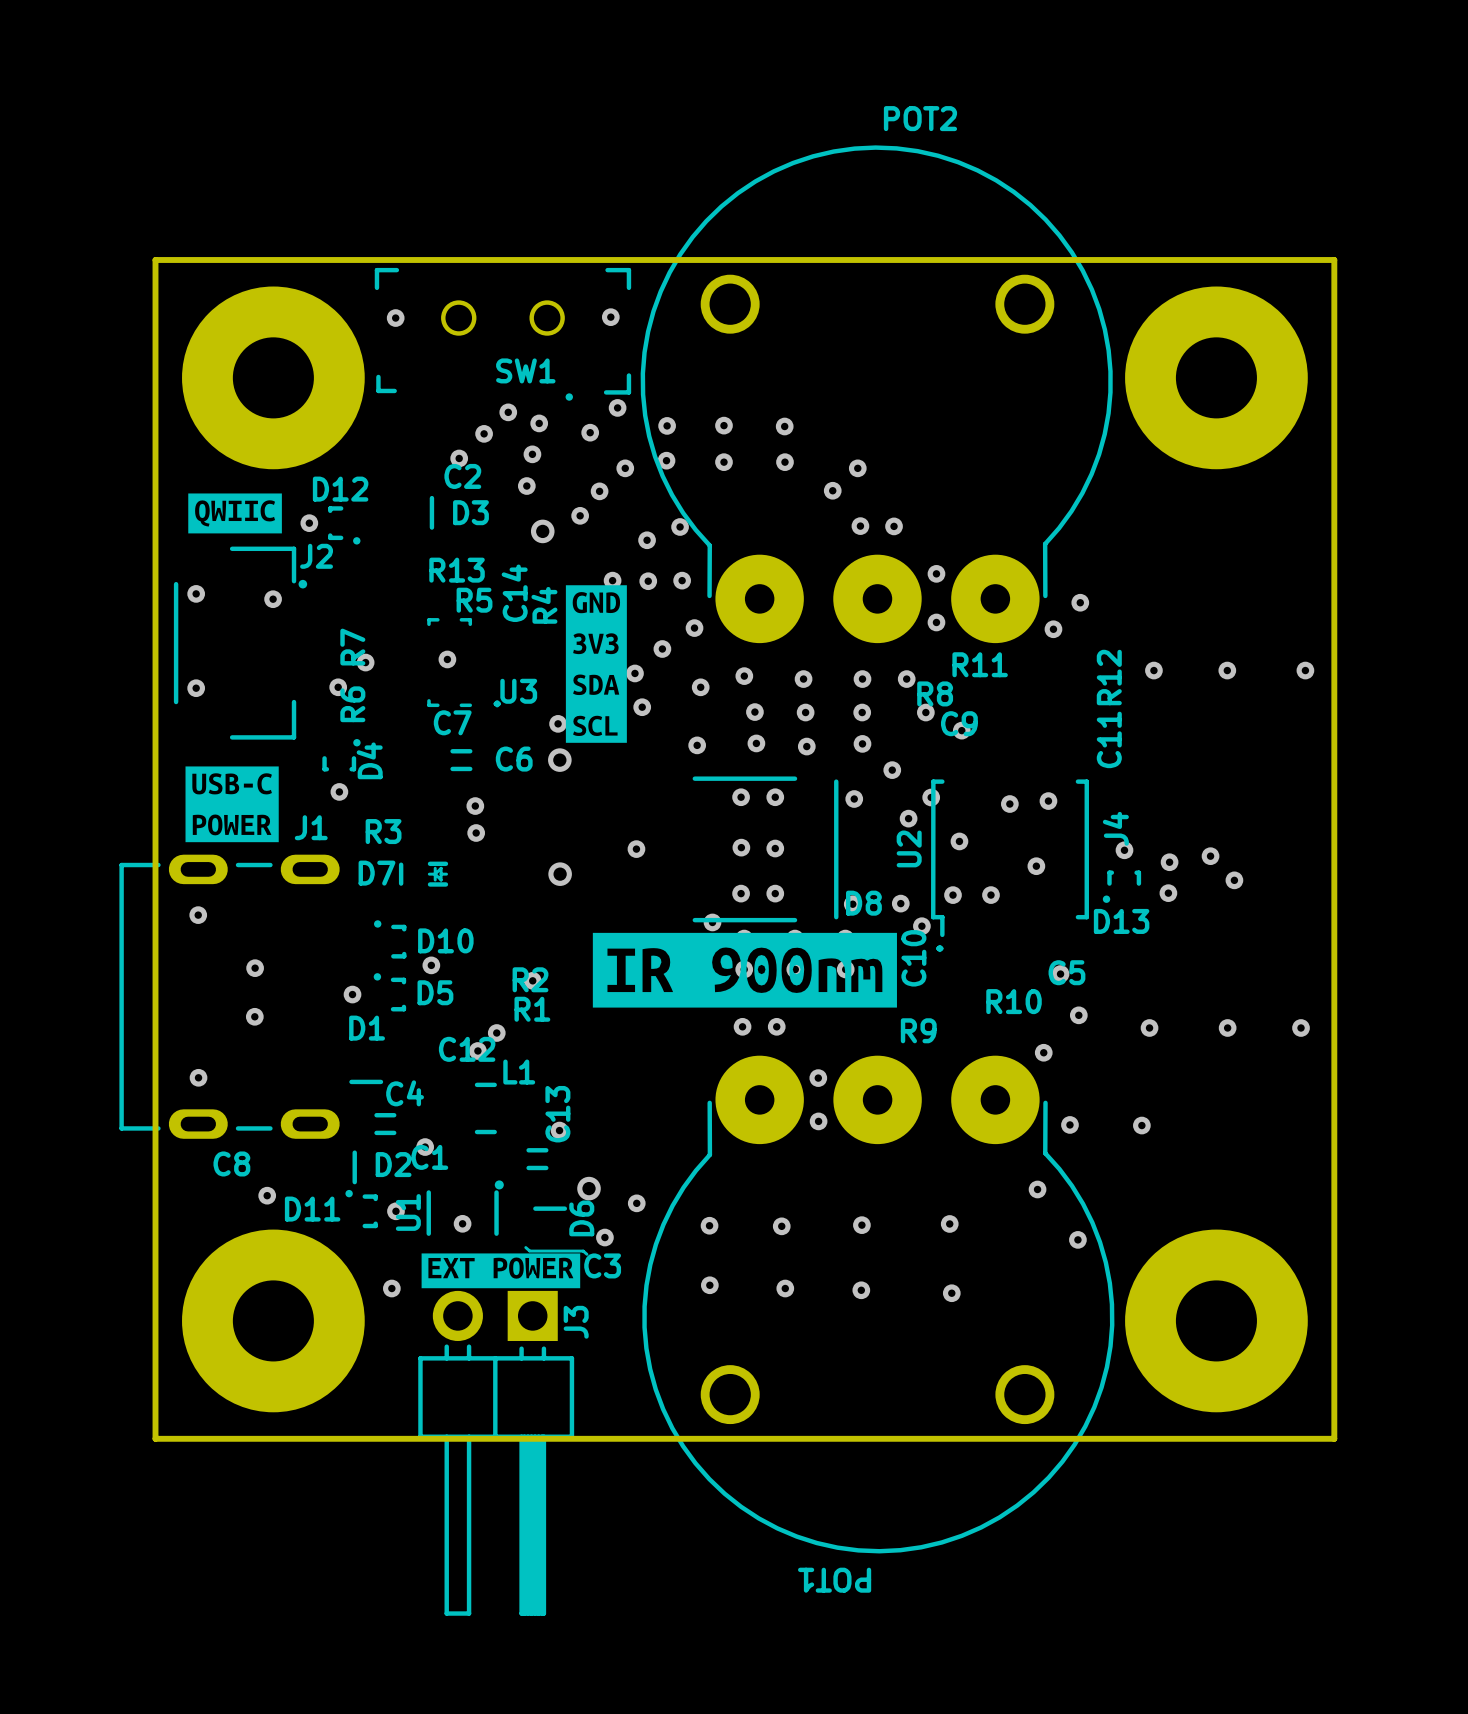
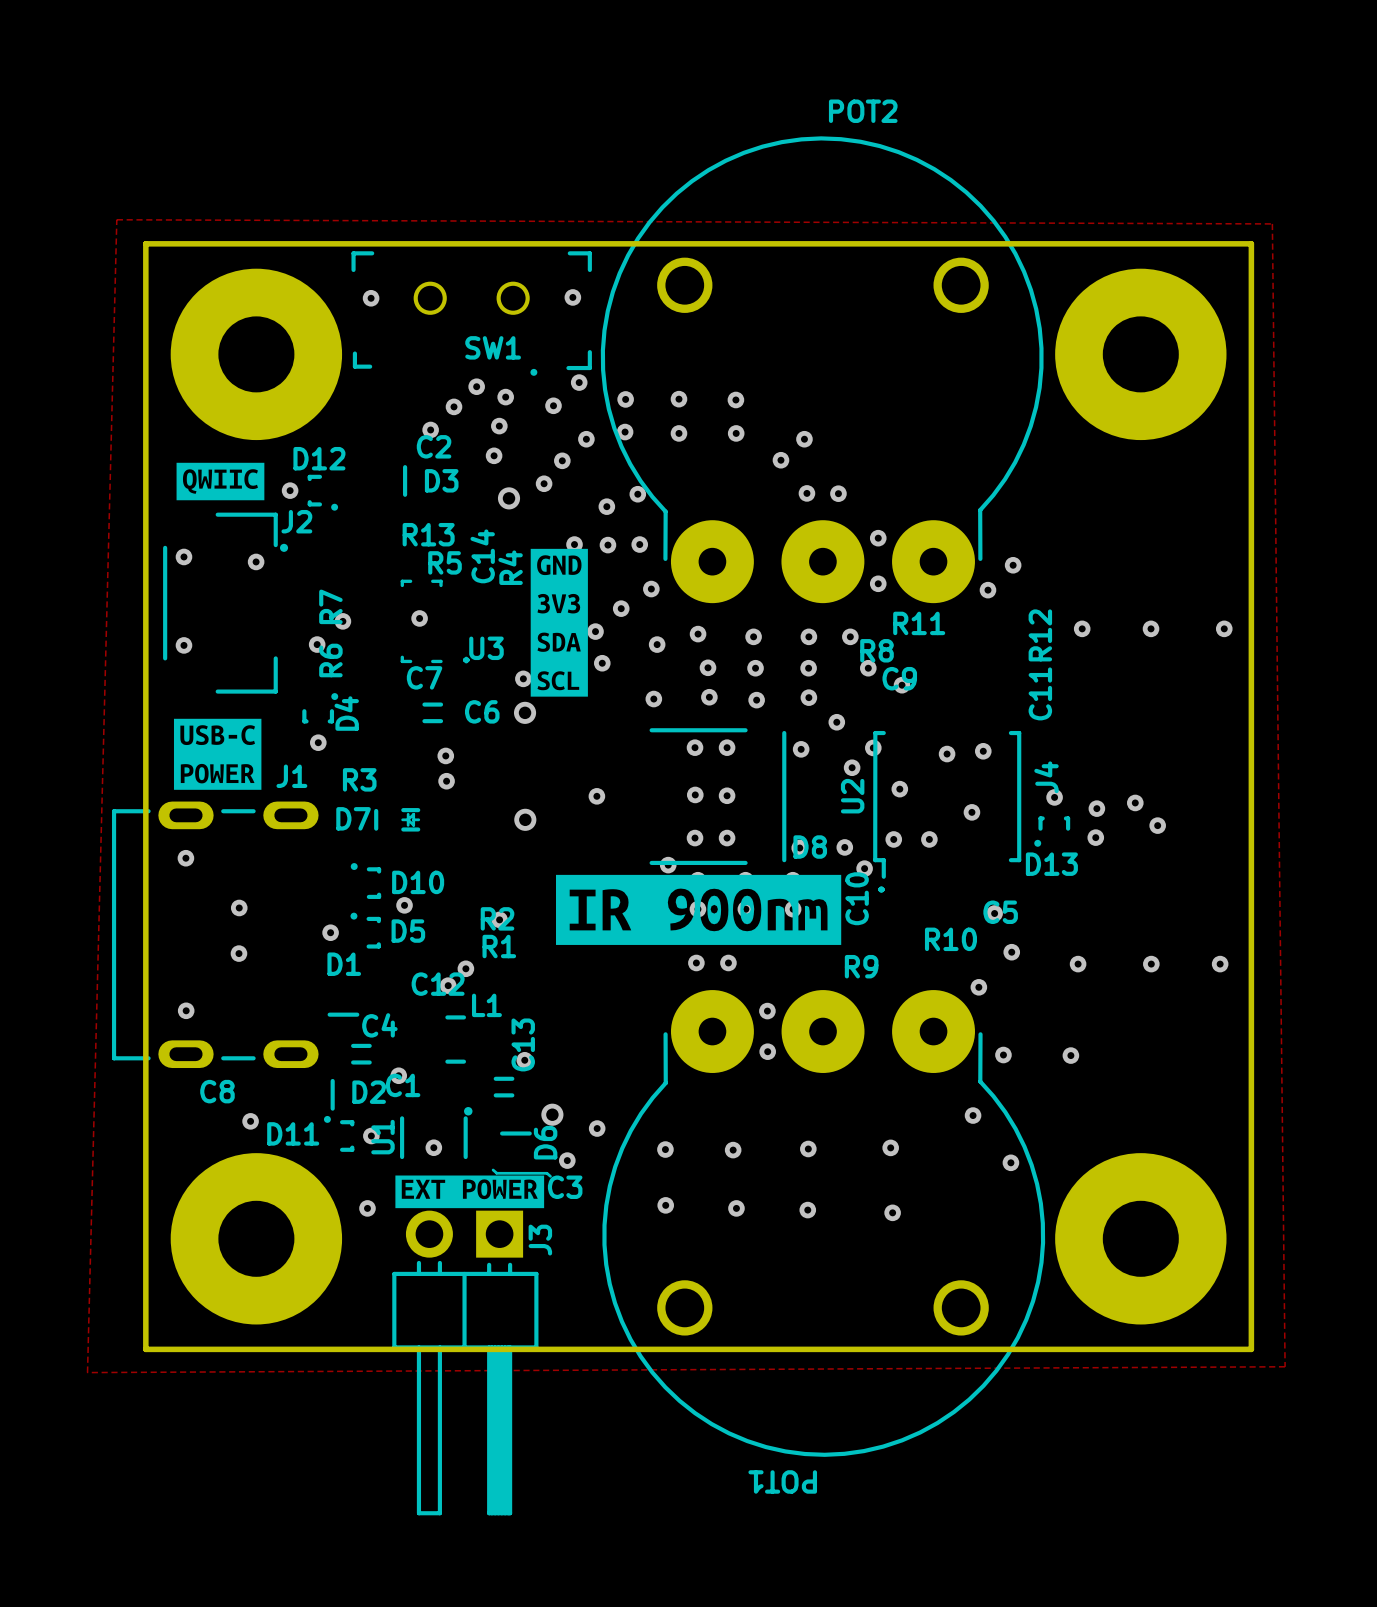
zone outline: none -> (116, 219) (87, 1372) (1285, 1366) (1272, 223) (116, 219)

